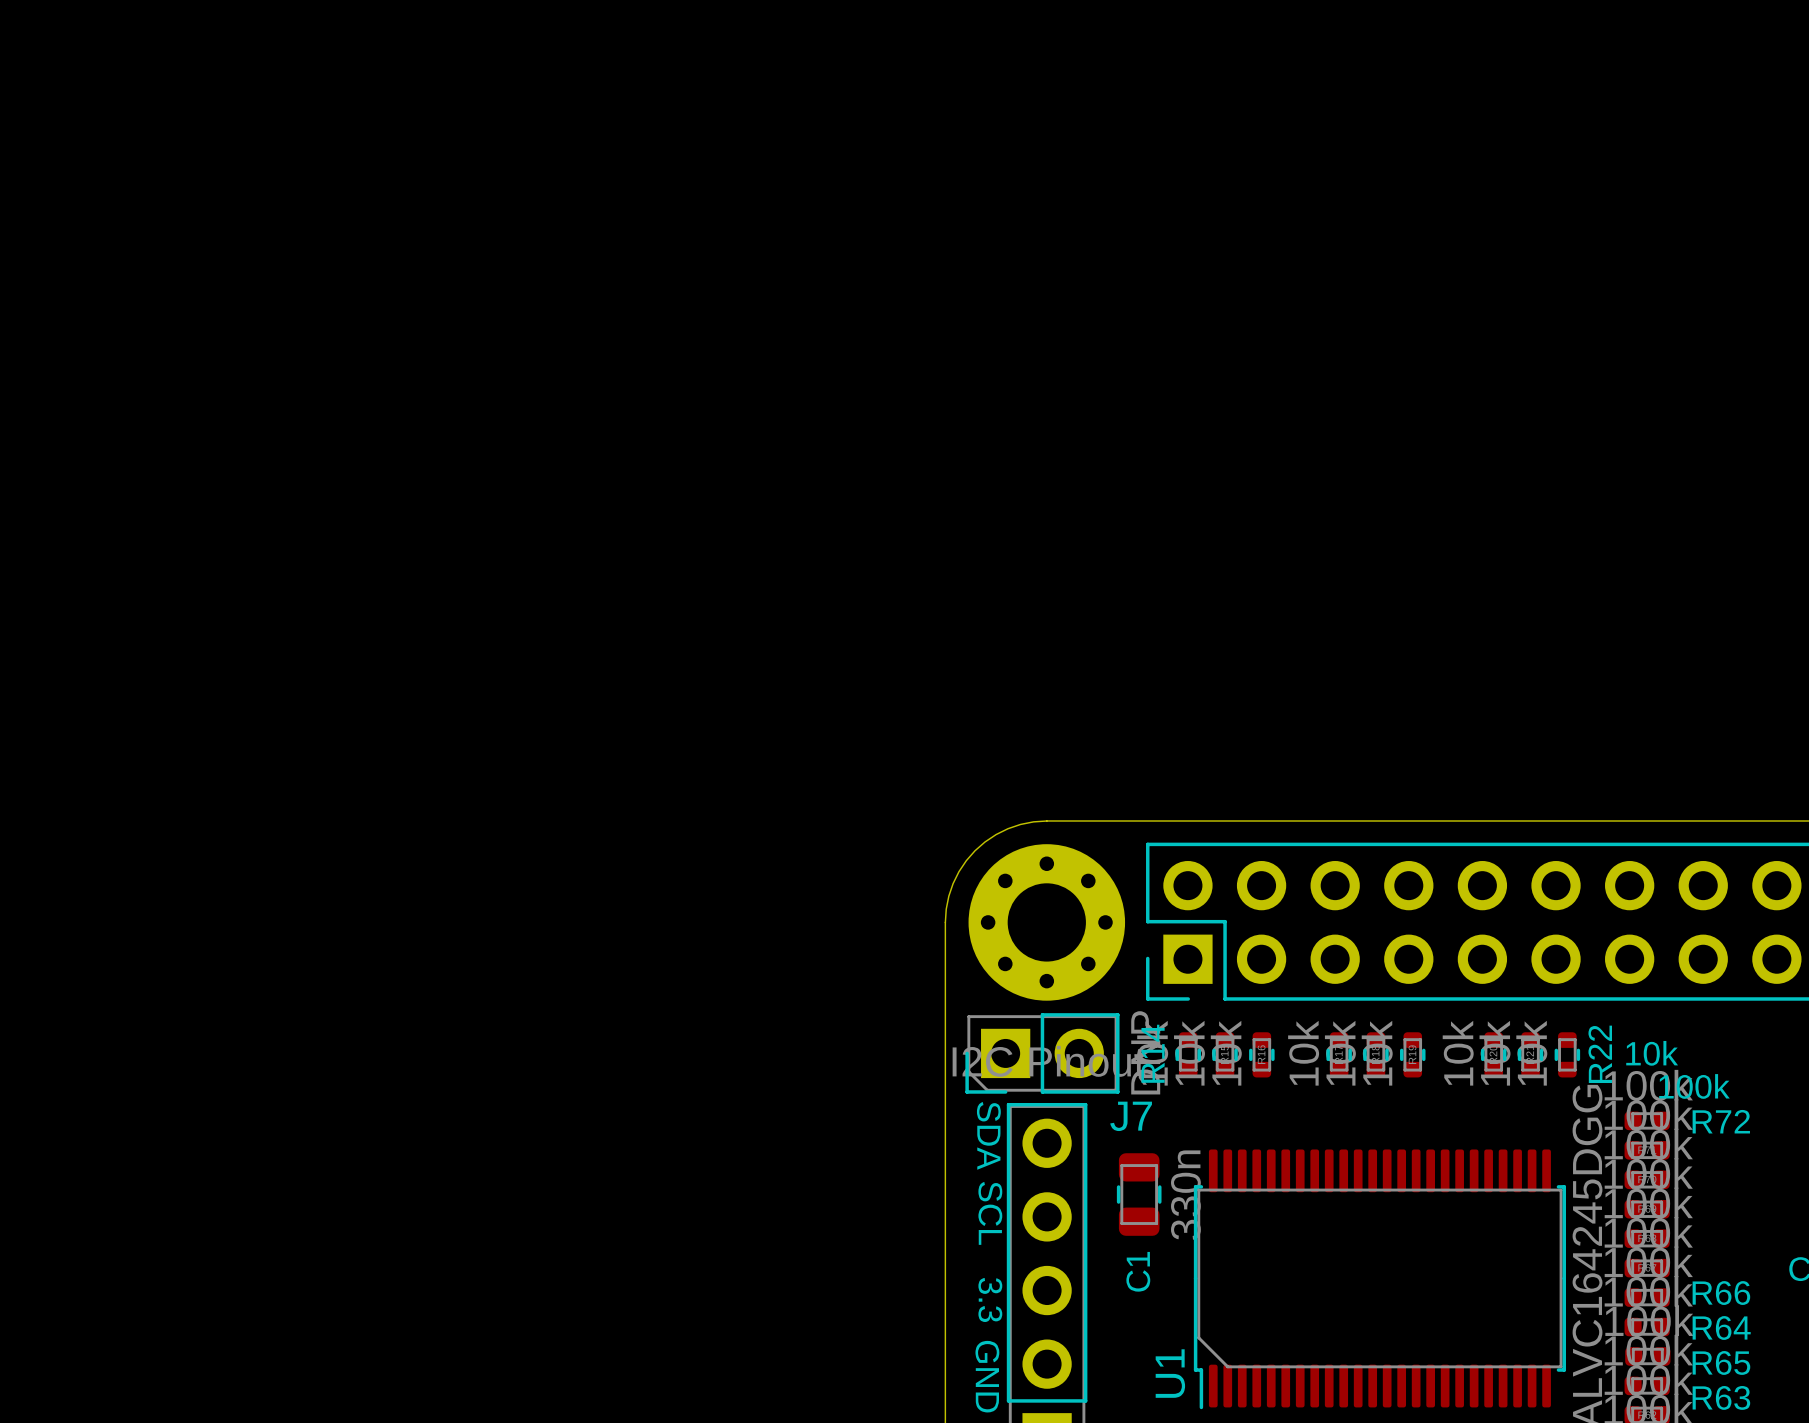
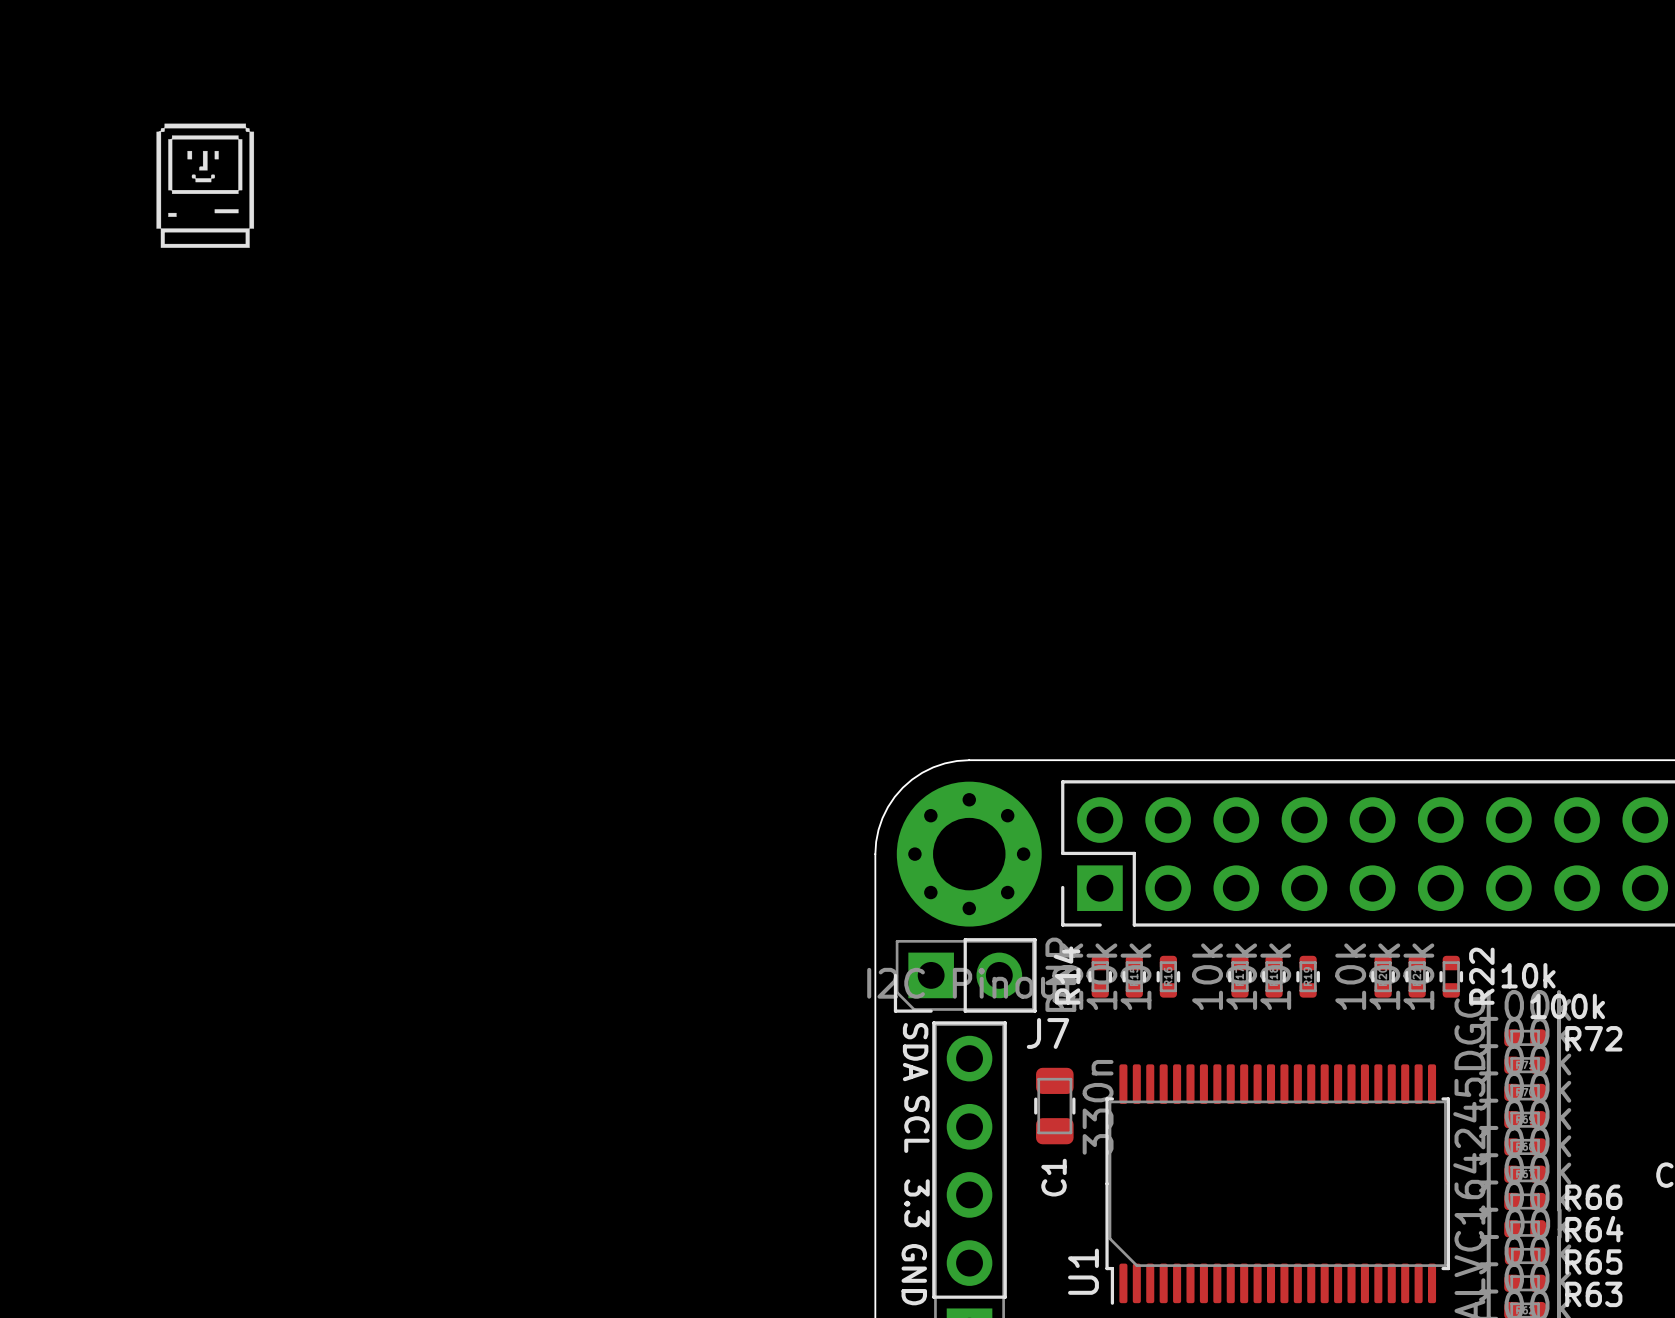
drawing: none -> [156, 123, 255, 248]

